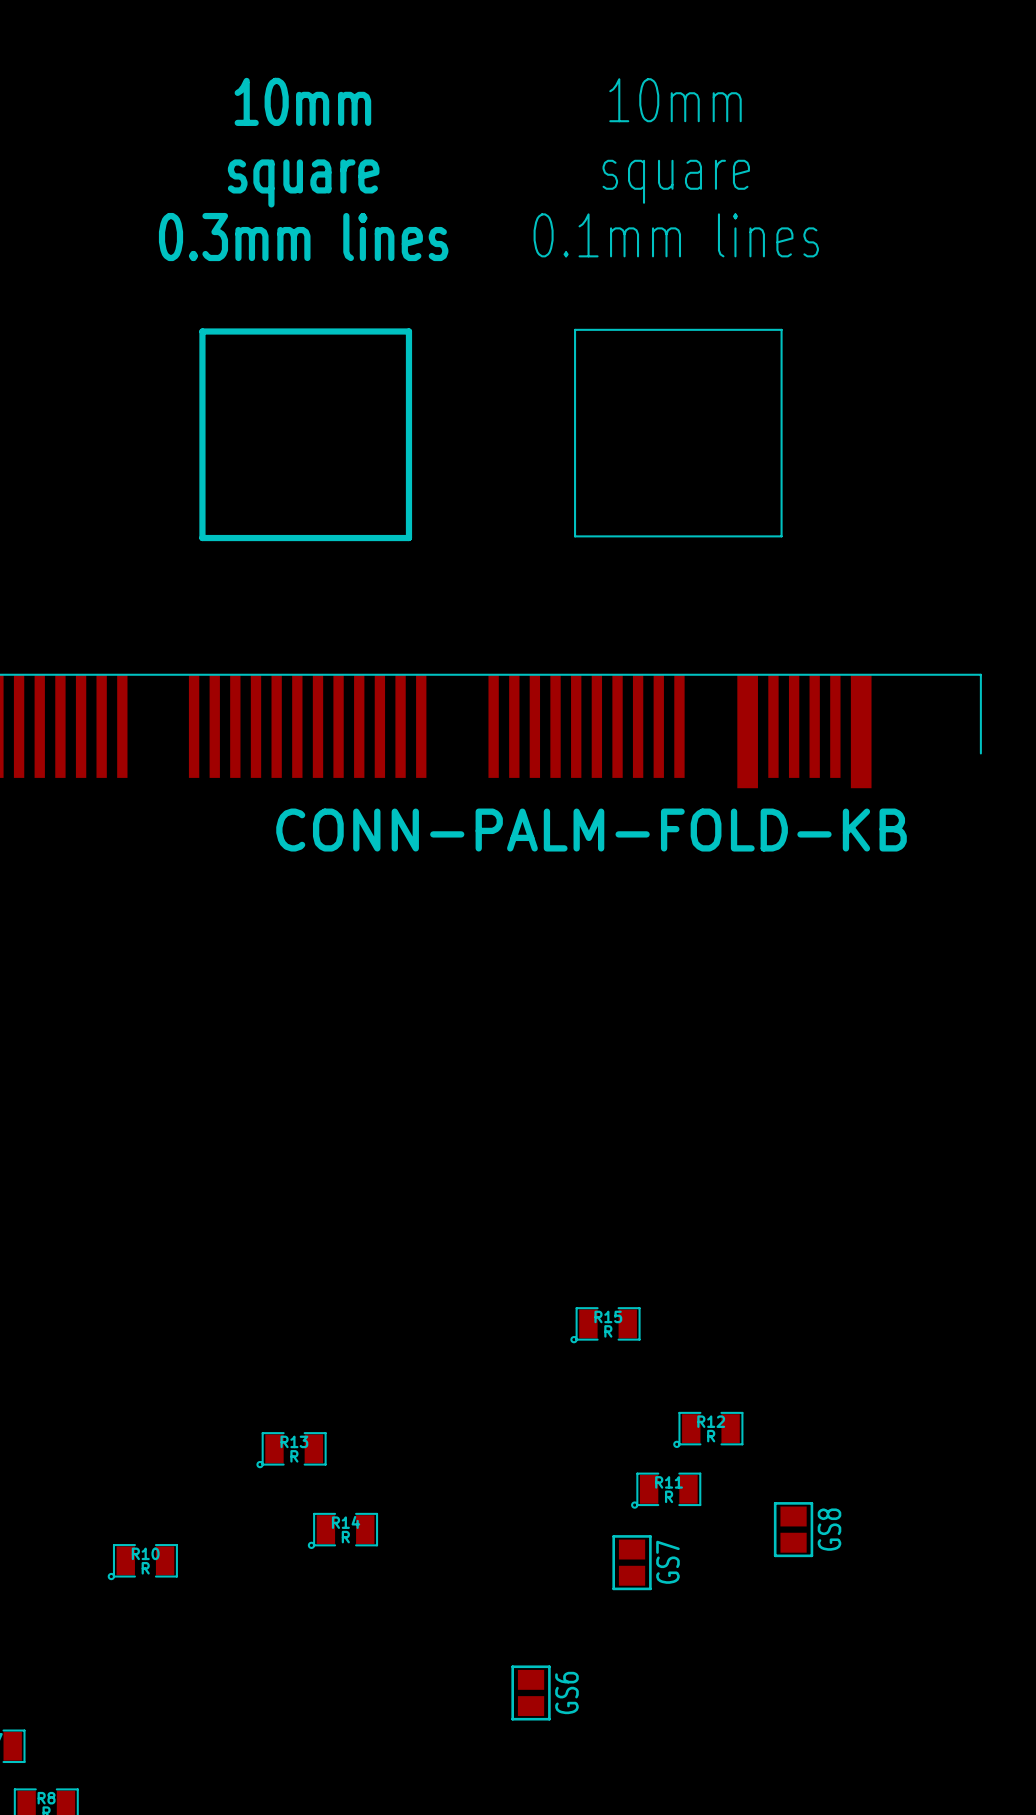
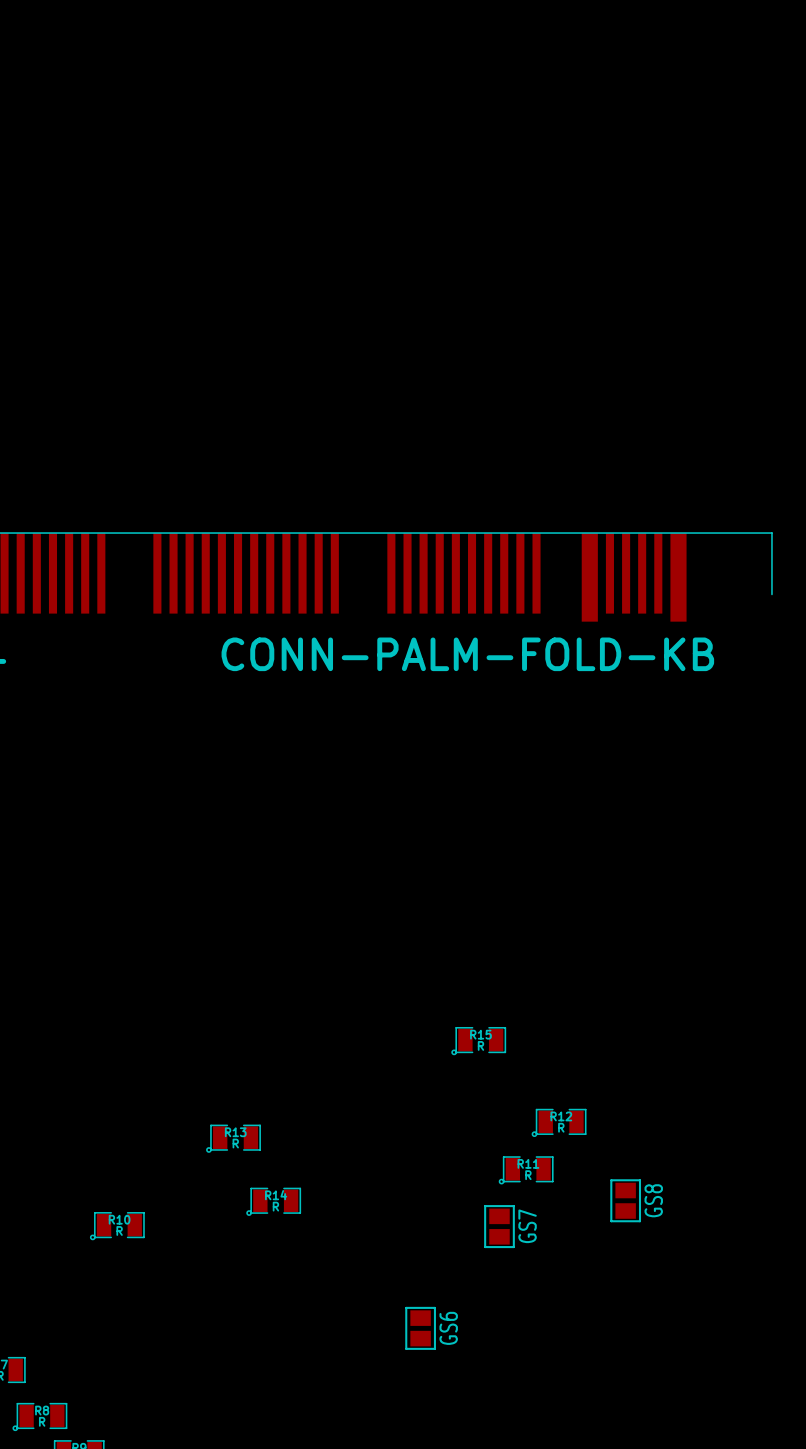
text: 10mm (675, 100) -> none
text: 10mm (302, 101) -> none
text: square (676, 181) -> none
text: square (303, 183) -> none
text: 0.1mm lines (676, 235) -> none
text: 0.3mm lines (303, 237) -> none
line: (575, 329) (781, 329) (781, 536) (575, 536) (575, 329) -> none
line: (202, 331) (202, 538) (408, 538) (408, 331) (202, 331) -> none

